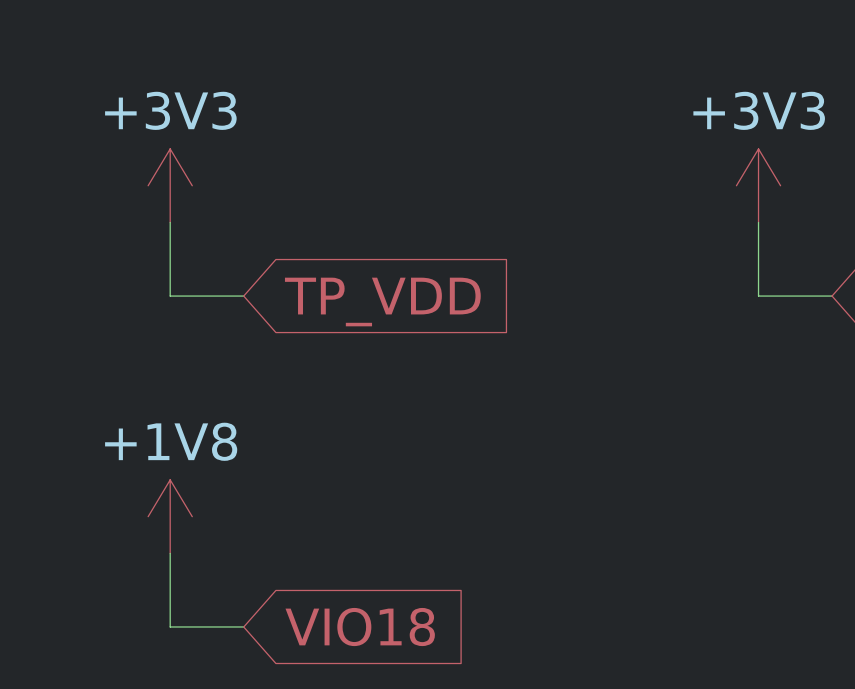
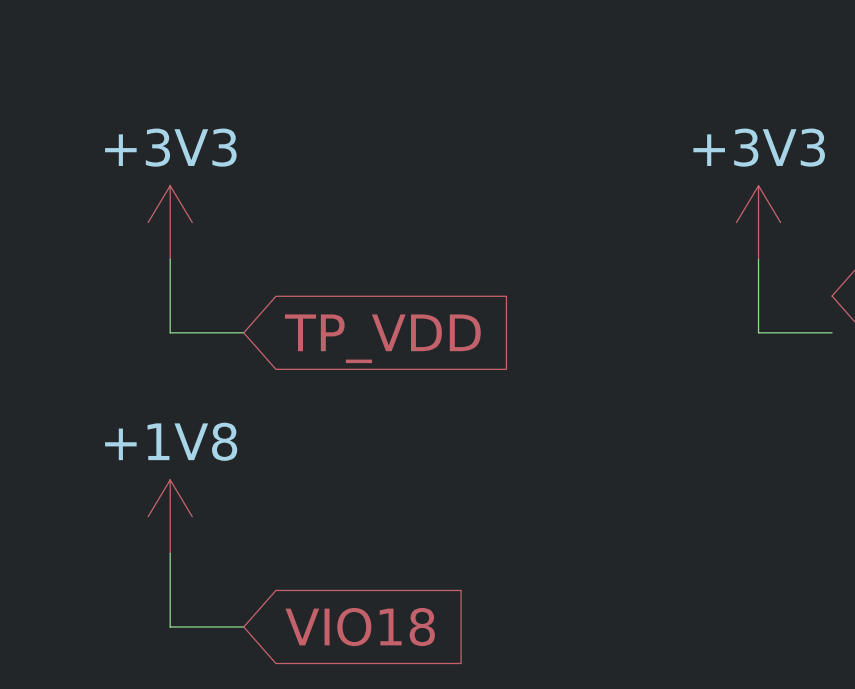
power symbol position: +3V3 (170, 185) -> +3V3 (170, 222)
power symbol position: +3V3 (758, 185) -> +3V3 (758, 222)
wire: (170, 296) (243, 296) -> (170, 296) (170, 332) (243, 332)
wire: (758, 296) (832, 296) -> (758, 296) (758, 332) (832, 332)
global label position: TP_VDD (382, 302) -> TP_VDD (382, 338)

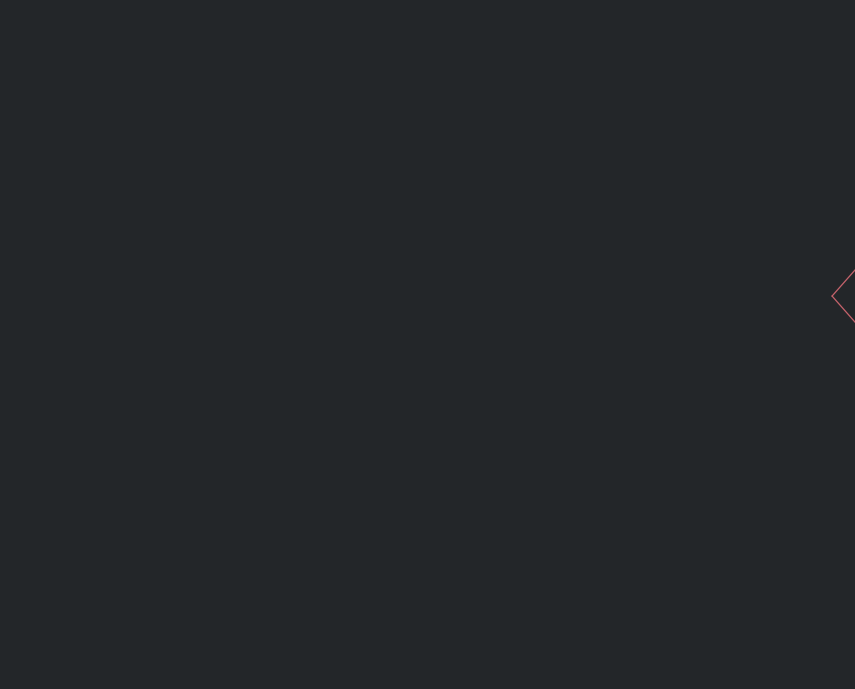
power symbol: +3V3 (170, 222) -> none
power symbol: +3V3 (758, 222) -> none
wire: (170, 259) (170, 332) (243, 332) -> none
wire: (758, 259) (758, 332) (832, 332) -> none
global label: TP_VDD (382, 338) -> none
power symbol: +1V8 (170, 516) -> none
wire: (170, 553) (170, 626) (243, 626) -> none
global label: VIO18 (360, 627) -> none

